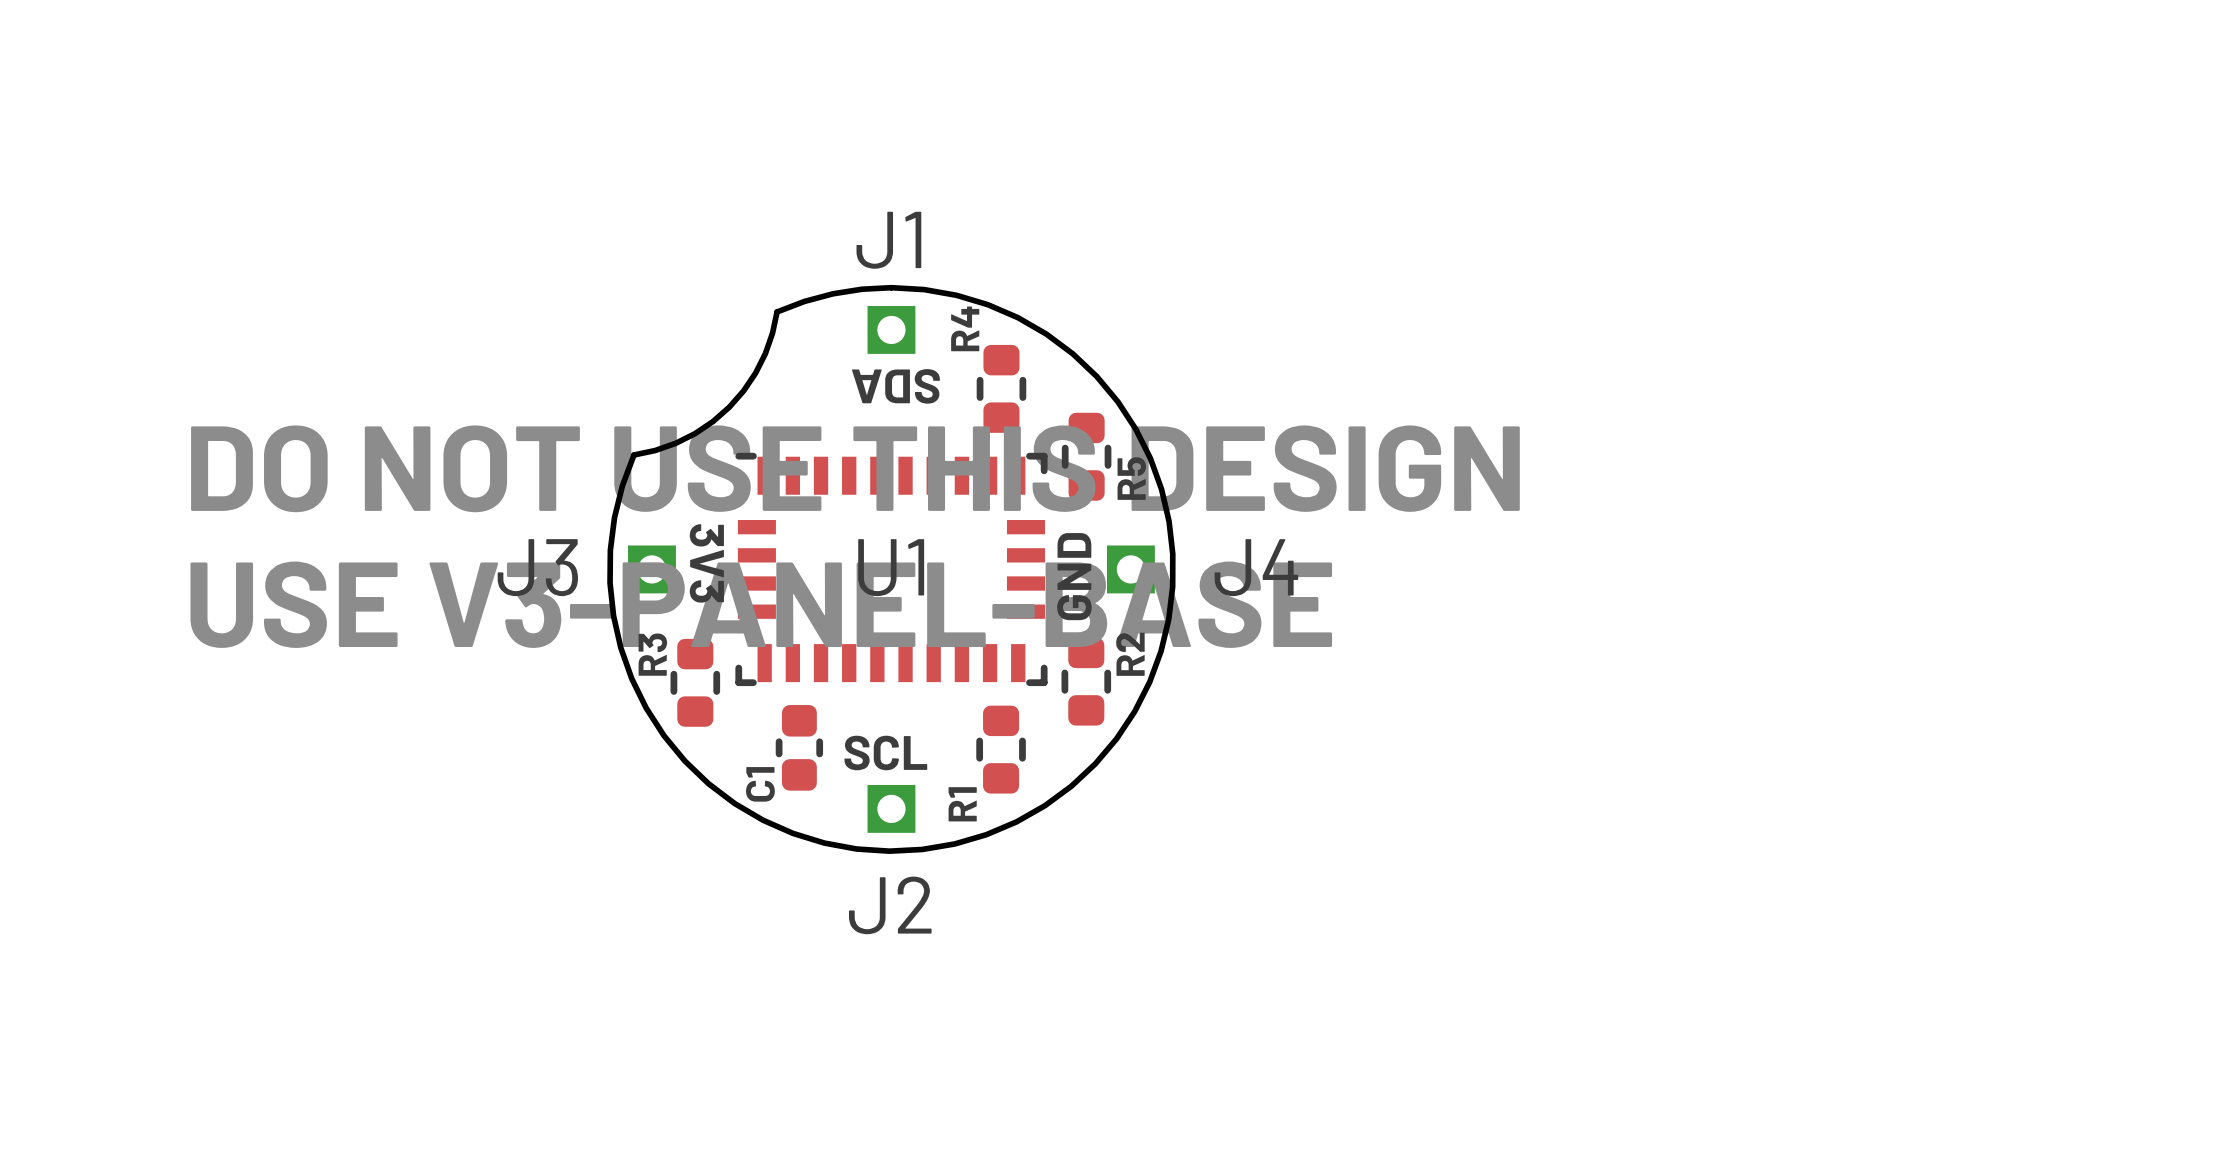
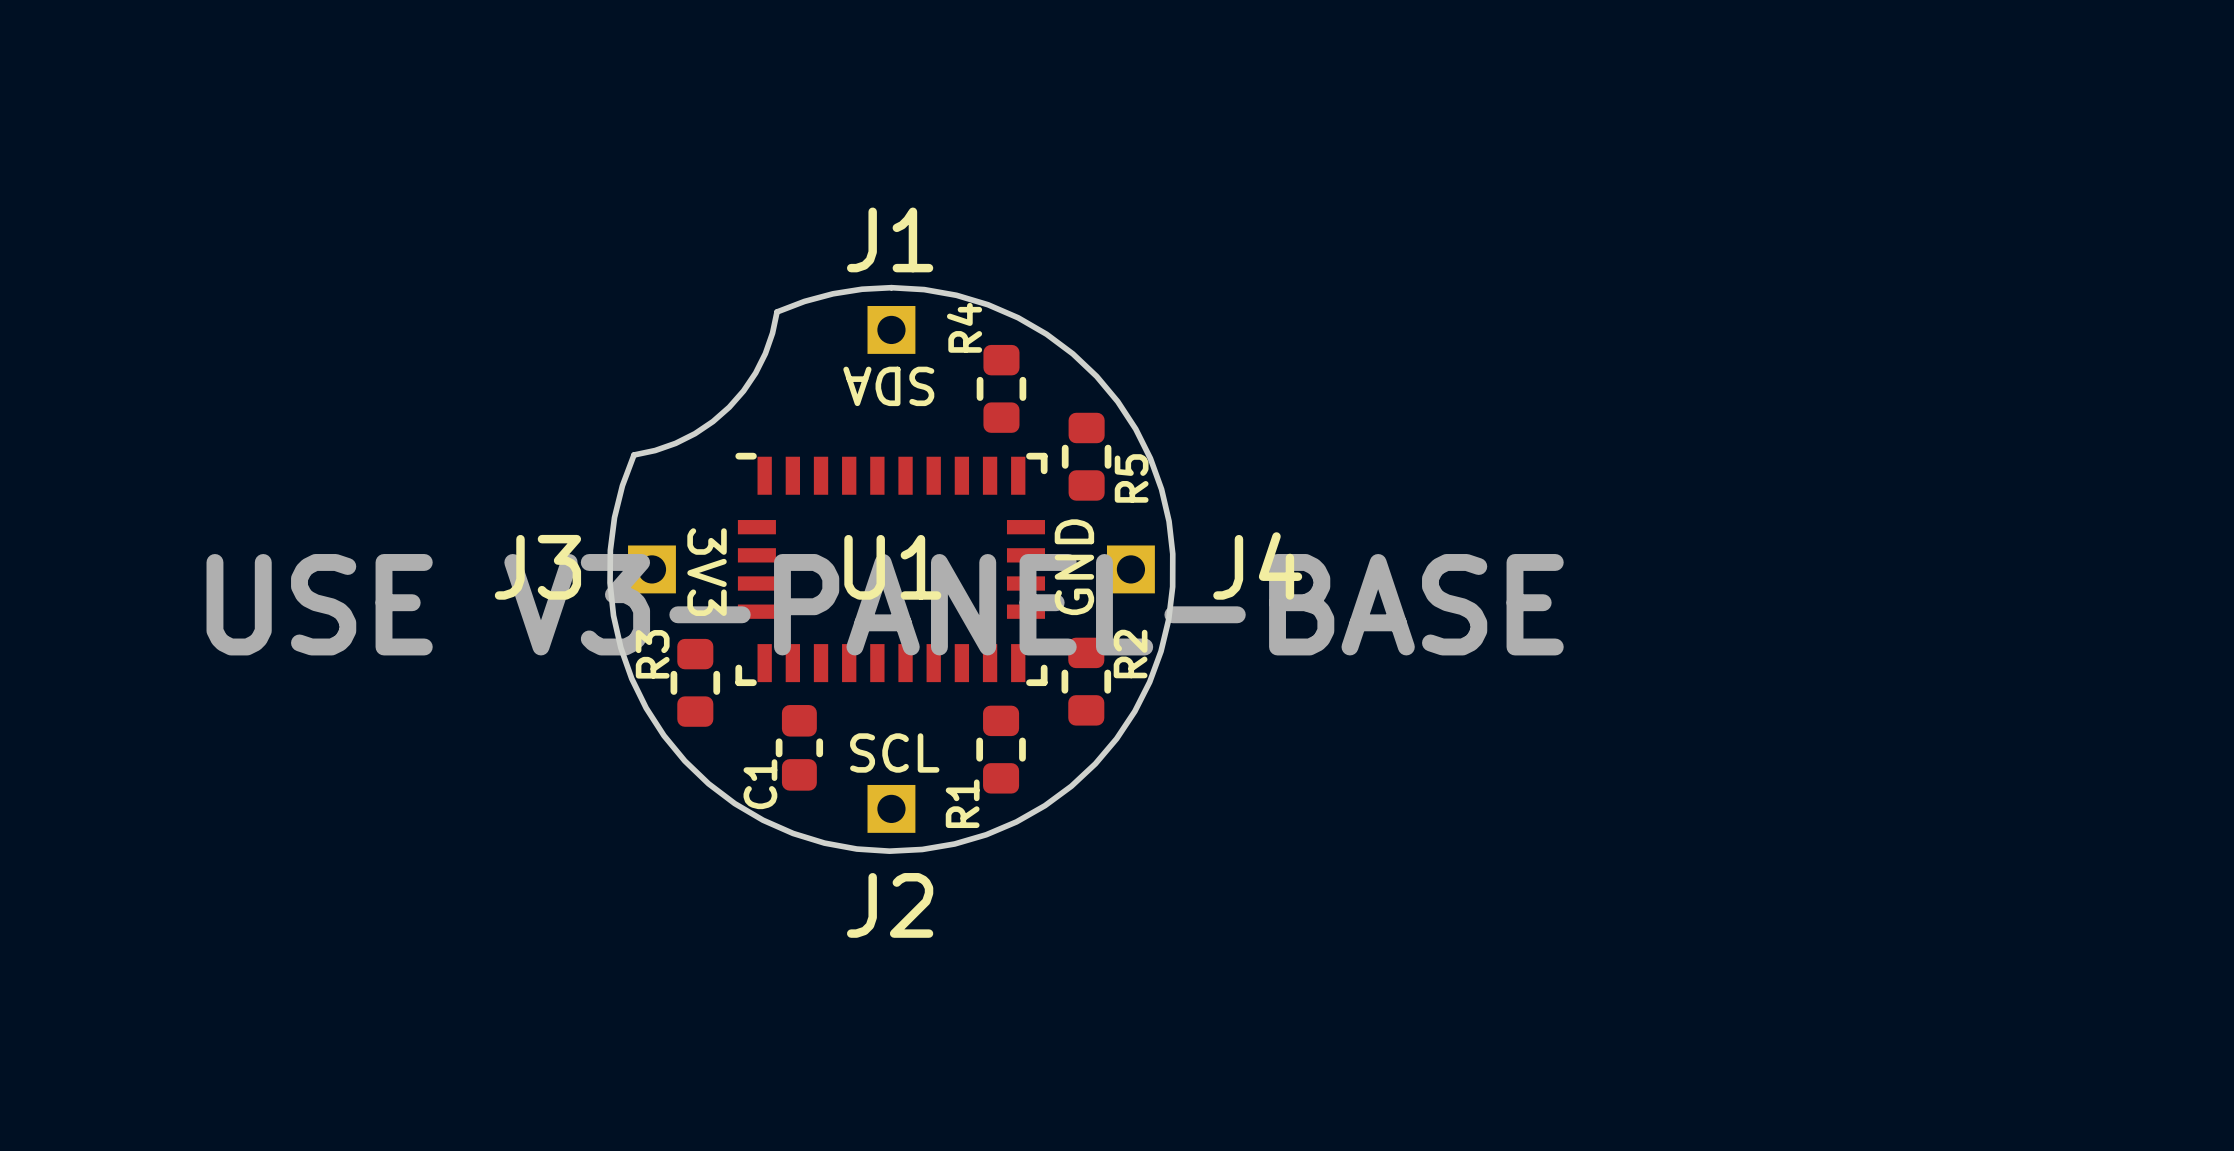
text: DO NOT USE THIS DESIGN (855, 468) -> none

